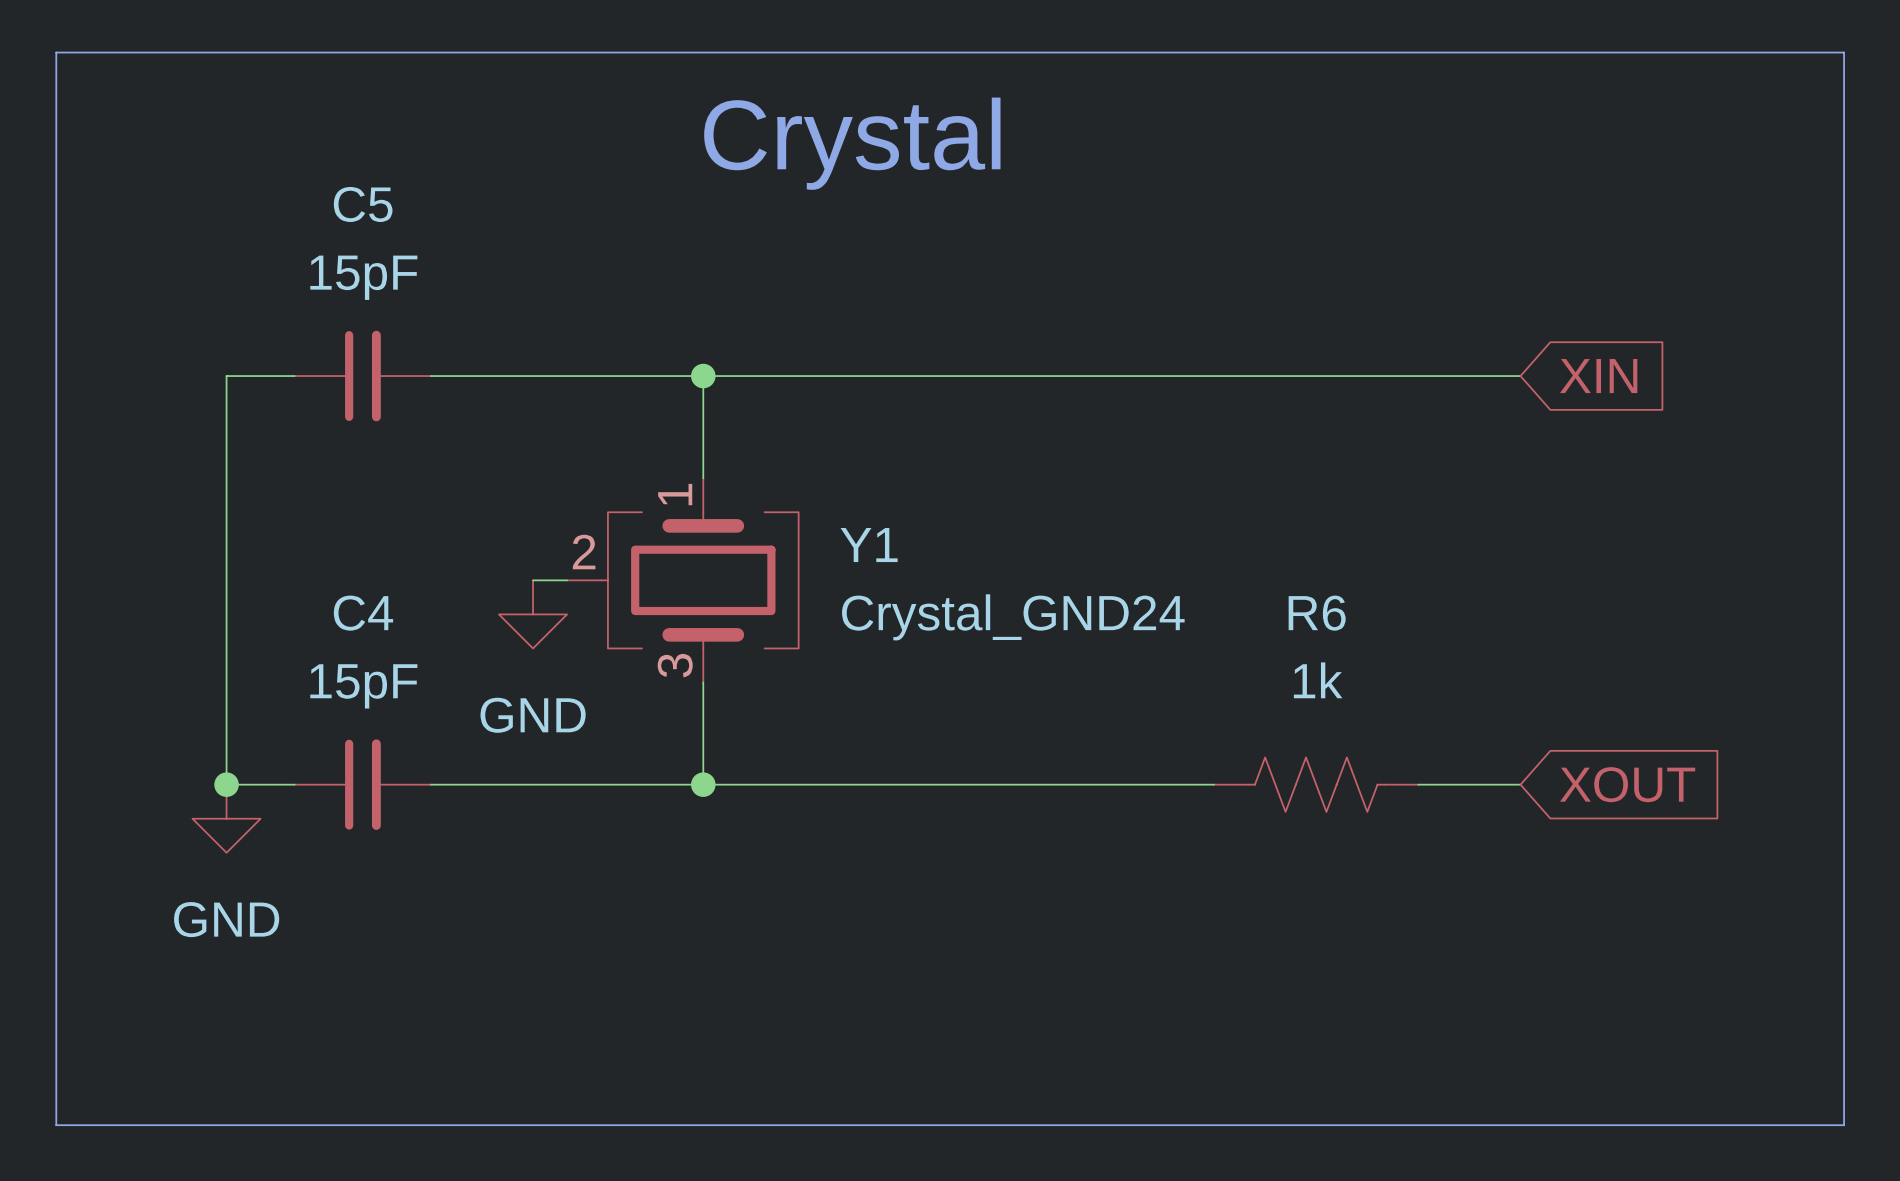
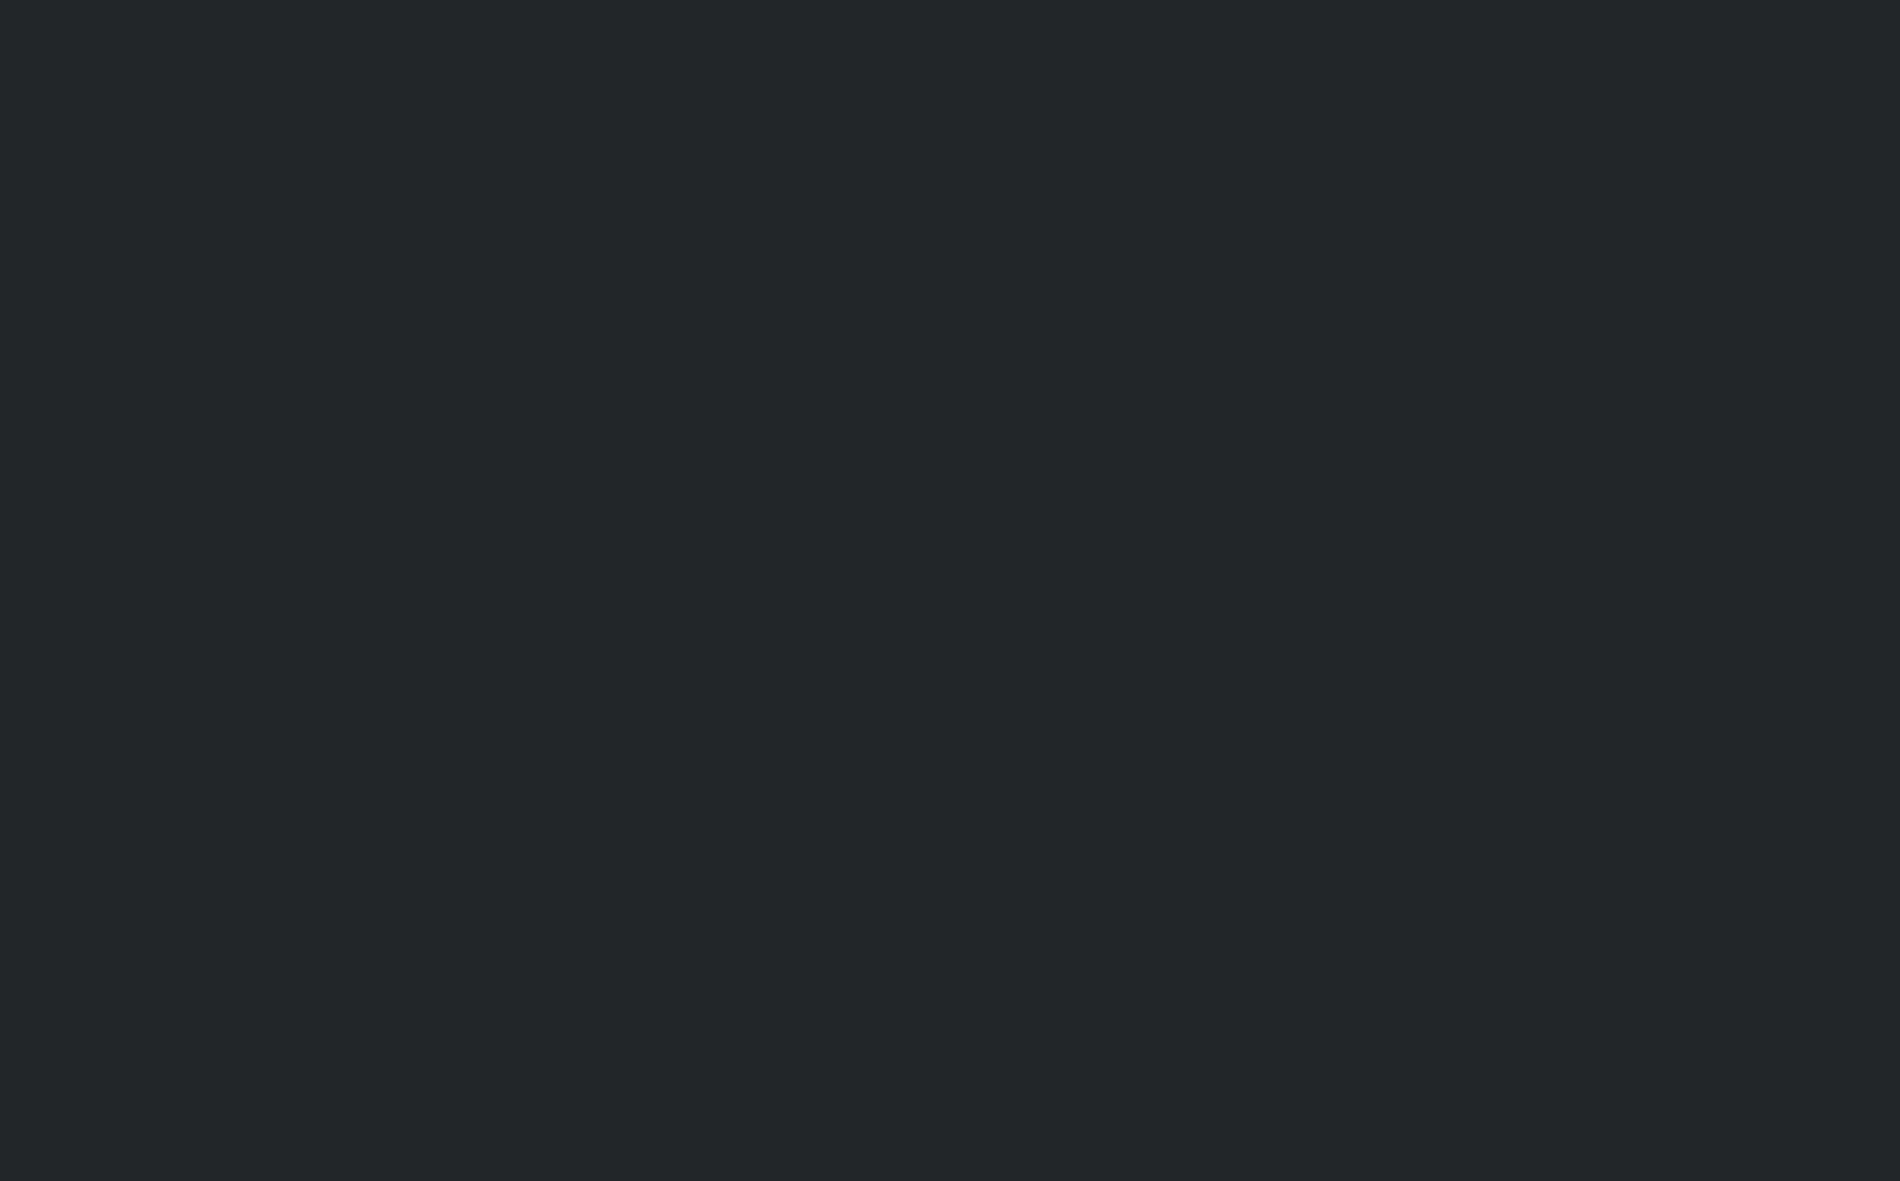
line: (56, 52) (1844, 52) (1844, 1125) (56, 1125) (56, 52) -> none
text: Crystal (852, 143) -> none
wire: (294, 376) (226, 376) (226, 784) (294, 784) -> none
C5: 15pF (362, 376) -> none
wire: (430, 376) (1520, 376) -> none
wire: (703, 376) (703, 478) -> none
junction: (703, 376) -> none
global label: XIN (1598, 376) -> none
wire: (533, 580) (567, 580) -> none
Y1: Crystal_GND24 (682, 580) -> none
power symbol: GND (533, 614) -> none
wire: (703, 682) (703, 784) -> none
junction: (226, 784) -> none
C4: 15pF (362, 784) -> none
wire: (430, 784) (1214, 784) -> none
junction: (703, 784) -> none
R6: 1k (1316, 784) -> none
wire: (1418, 784) (1520, 784) -> none
global label: XOUT (1627, 784) -> none
power symbol: GND (226, 818) -> none

